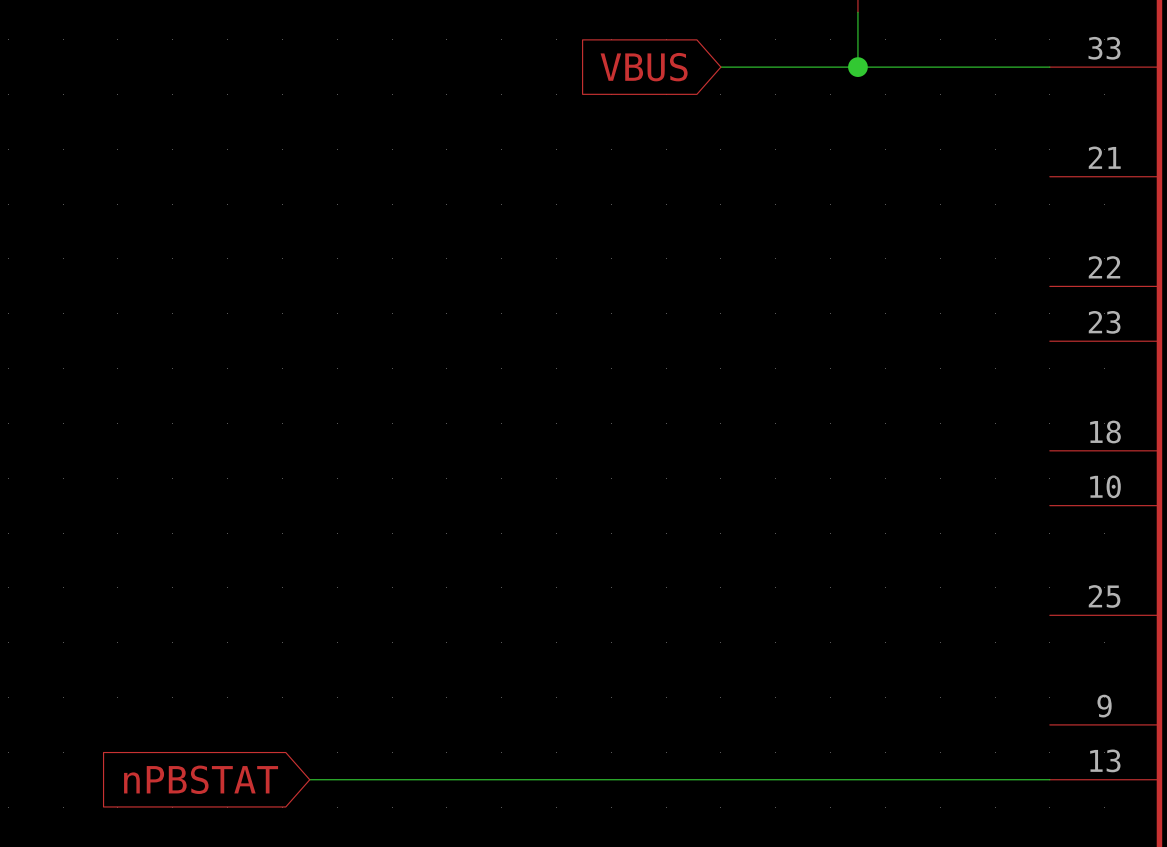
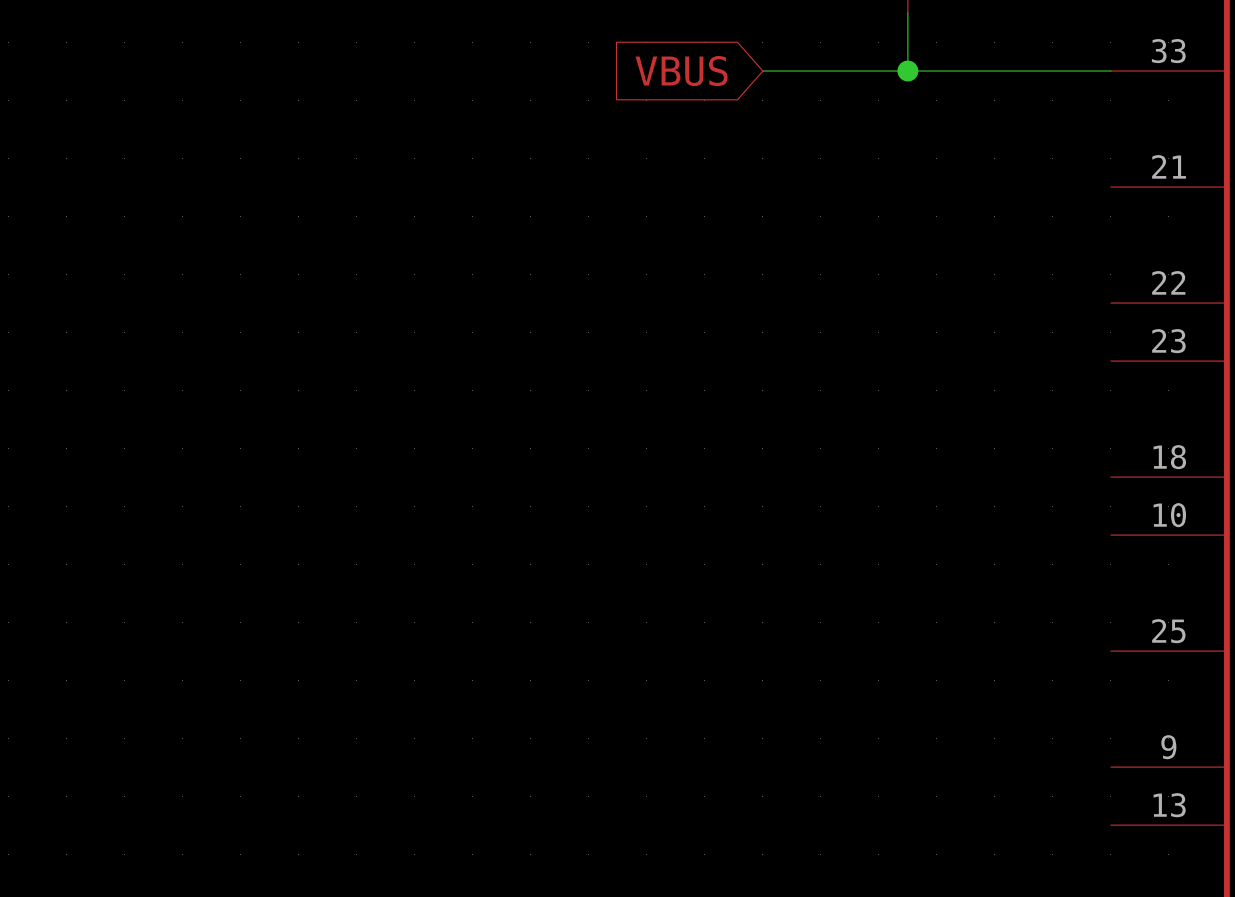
global label: nPBSTAT (201, 779) -> none
wire: (309, 779) (1049, 779) -> none

